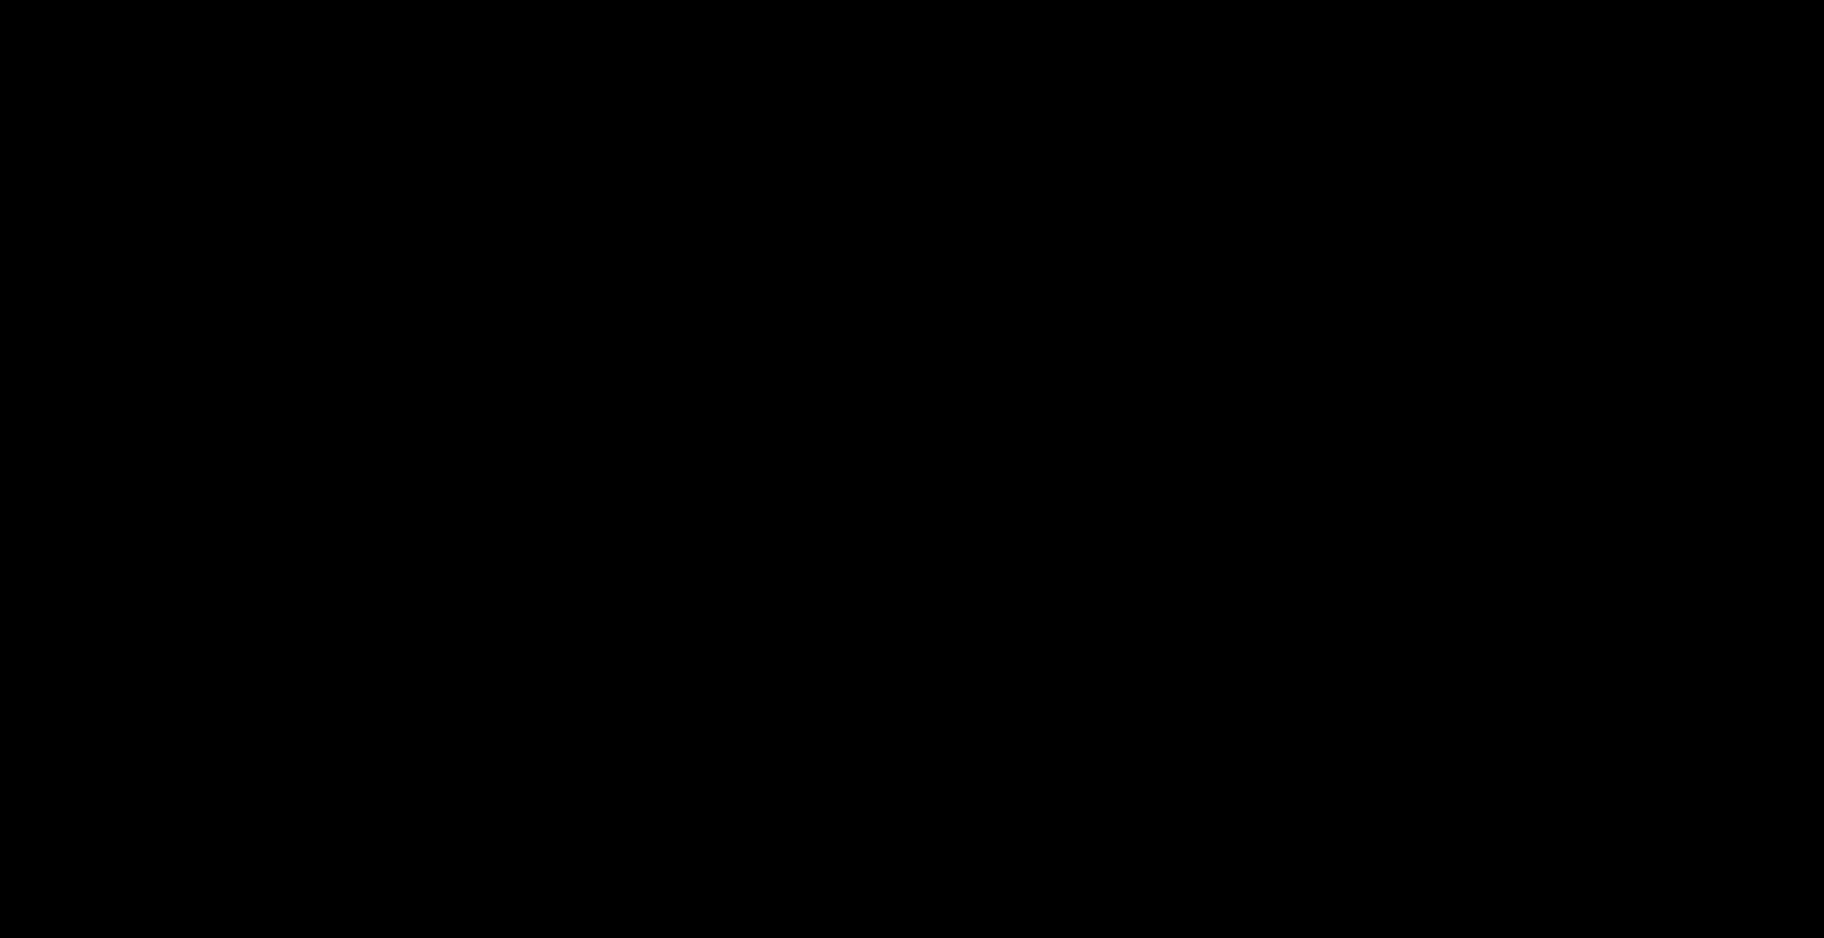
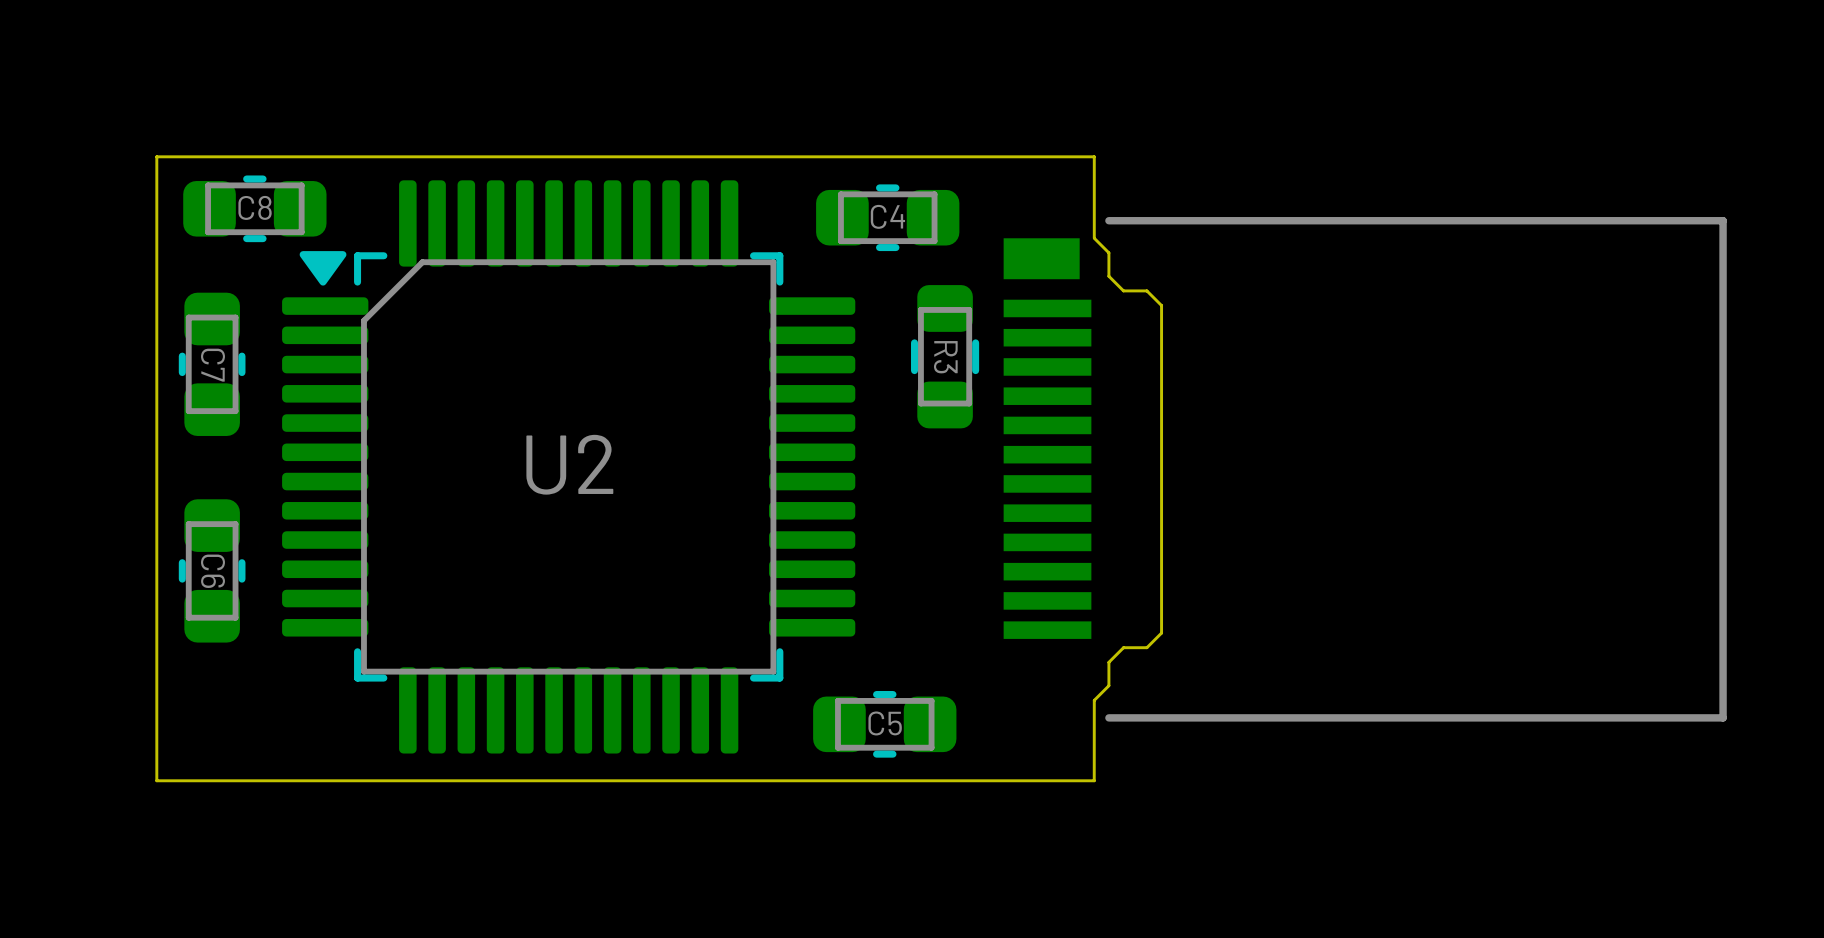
C8: none -> (254, 208)
C4: none -> (887, 217)
board edge: none -> (1094, 237) (1094, 156) (156, 156) (156, 780) (1094, 780) (1094, 700)
R3: none -> (945, 356)
C7: none -> (212, 364)
U2: none -> (568, 466)
part: none -> (1365, 469)
C6: none -> (212, 570)
C5: none -> (884, 724)

